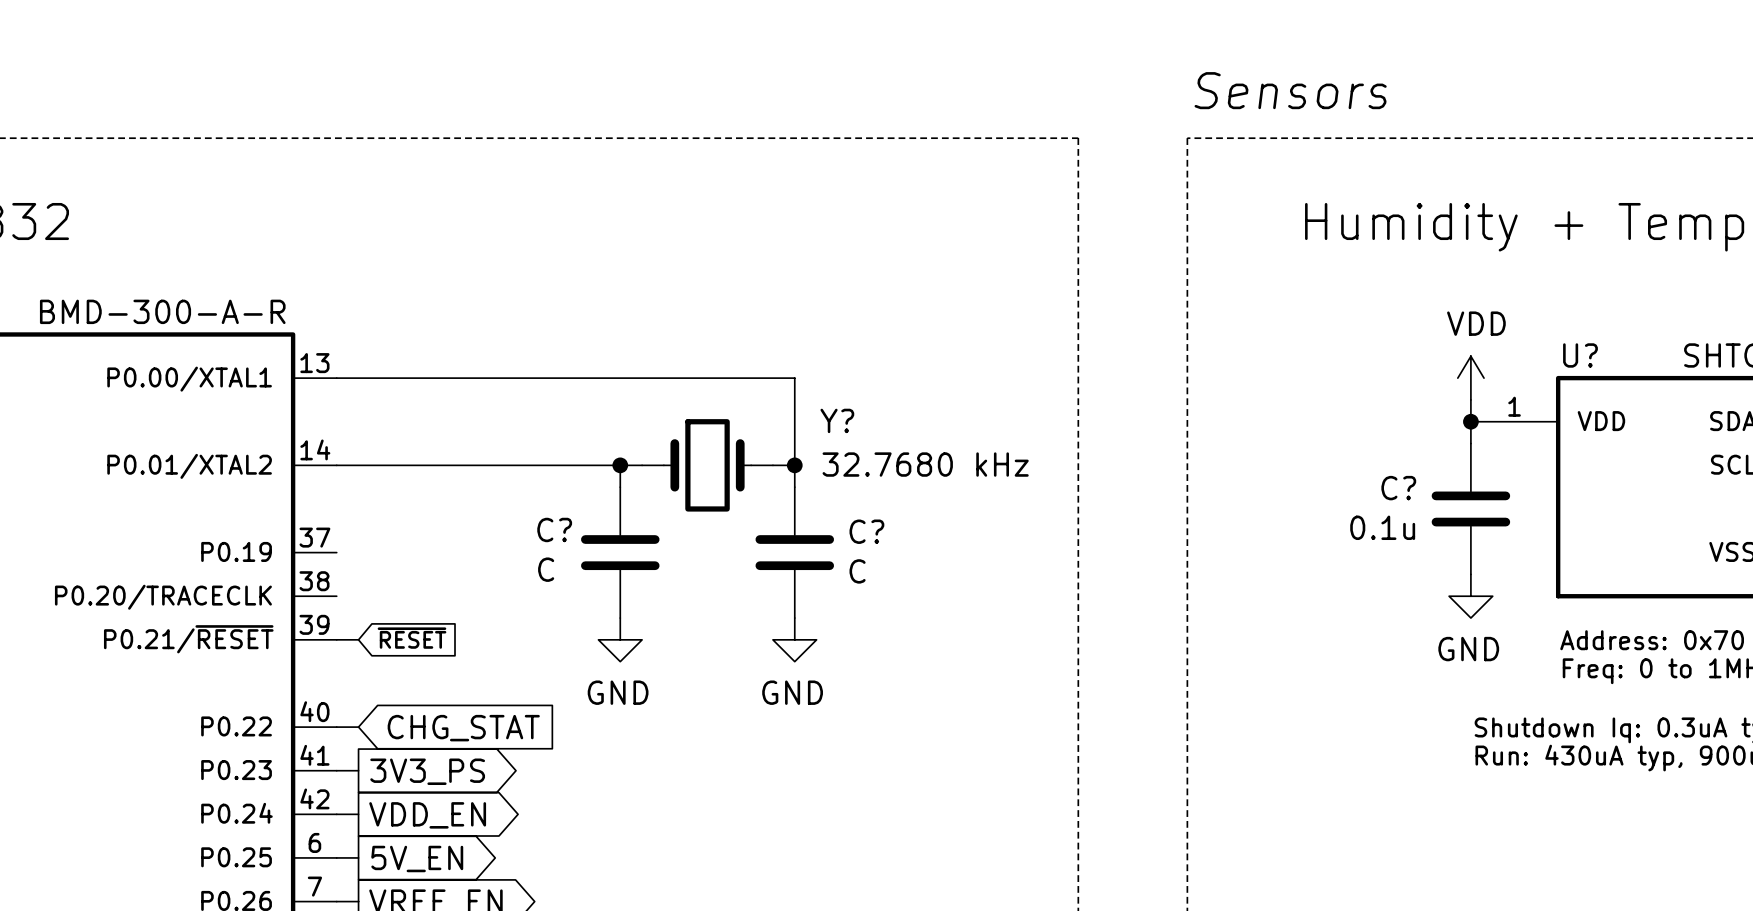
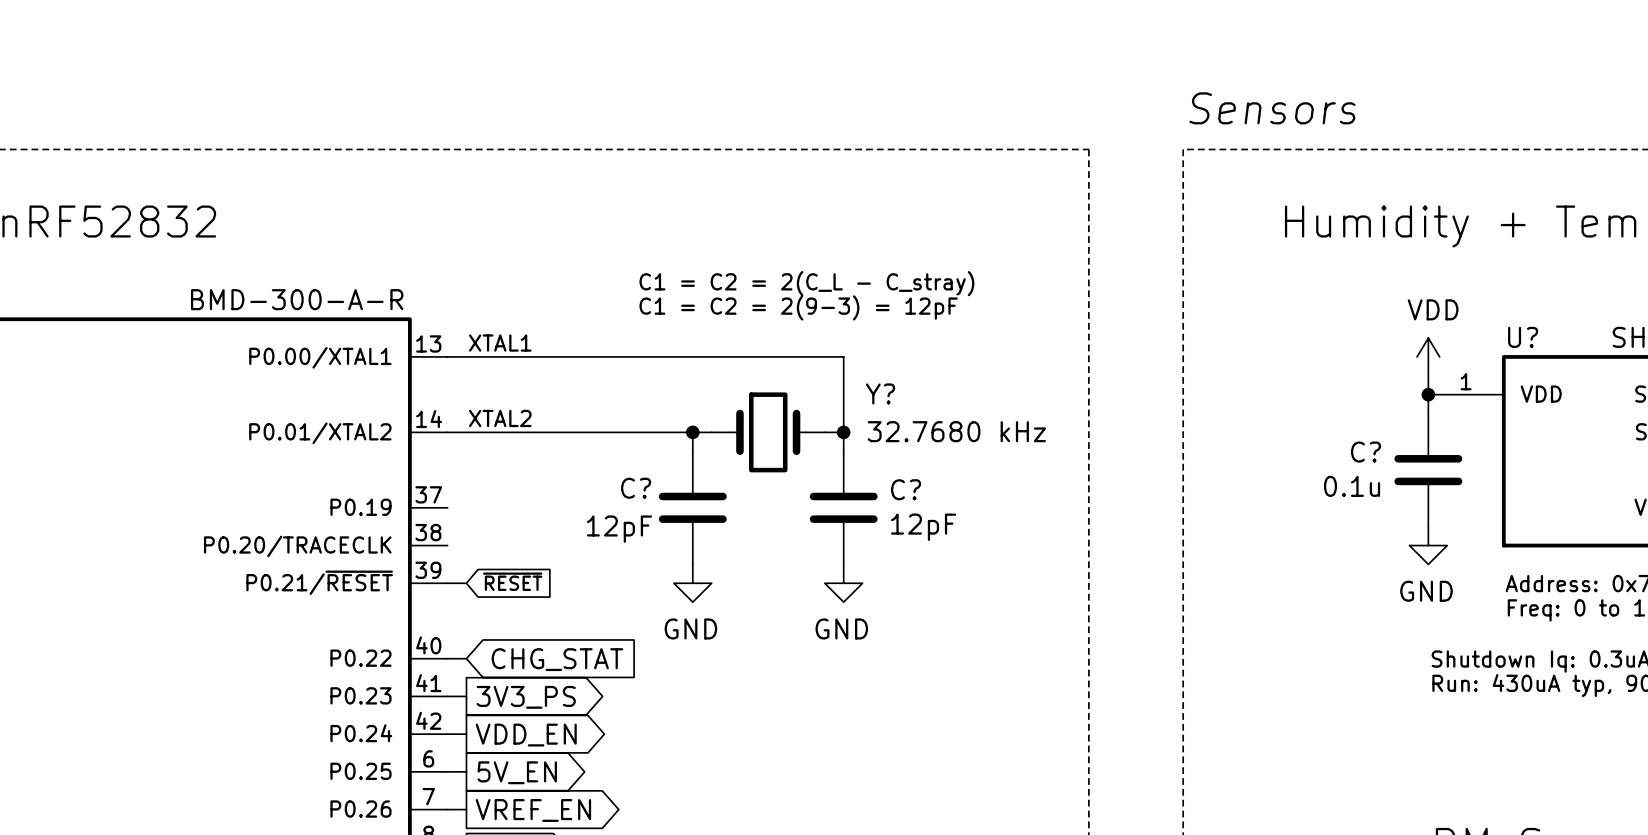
text: none -> C1 = C2 = 2(C_L - C_stray) (806, 283)
text: none -> C1 = C2 = 2(9-3) = 12pF (798, 307)
label: none -> XTAL1 (500, 343)
label: none -> XTAL2 (500, 418)
C? value: C (546, 569) -> 12pF (619, 529)
C? value: C (857, 571) -> 12pF (923, 527)

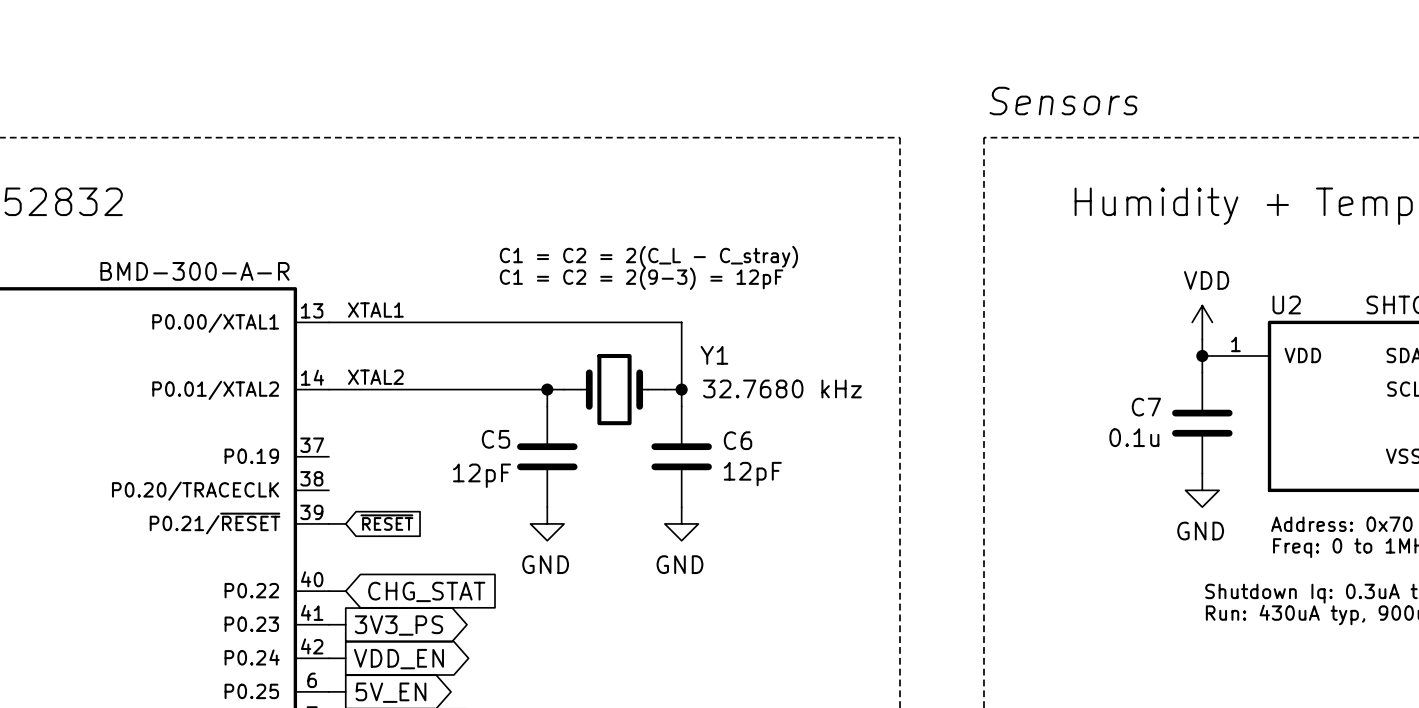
U? name: U? (1523, 337) -> U2 (1286, 304)
Y? name: Y? (880, 393) -> Y1 (714, 355)
C? name: C? (1365, 452) -> C7 (1146, 407)
C? name: C? (636, 488) -> C5 (495, 439)
C? name: C? (906, 489) -> C6 (738, 440)

